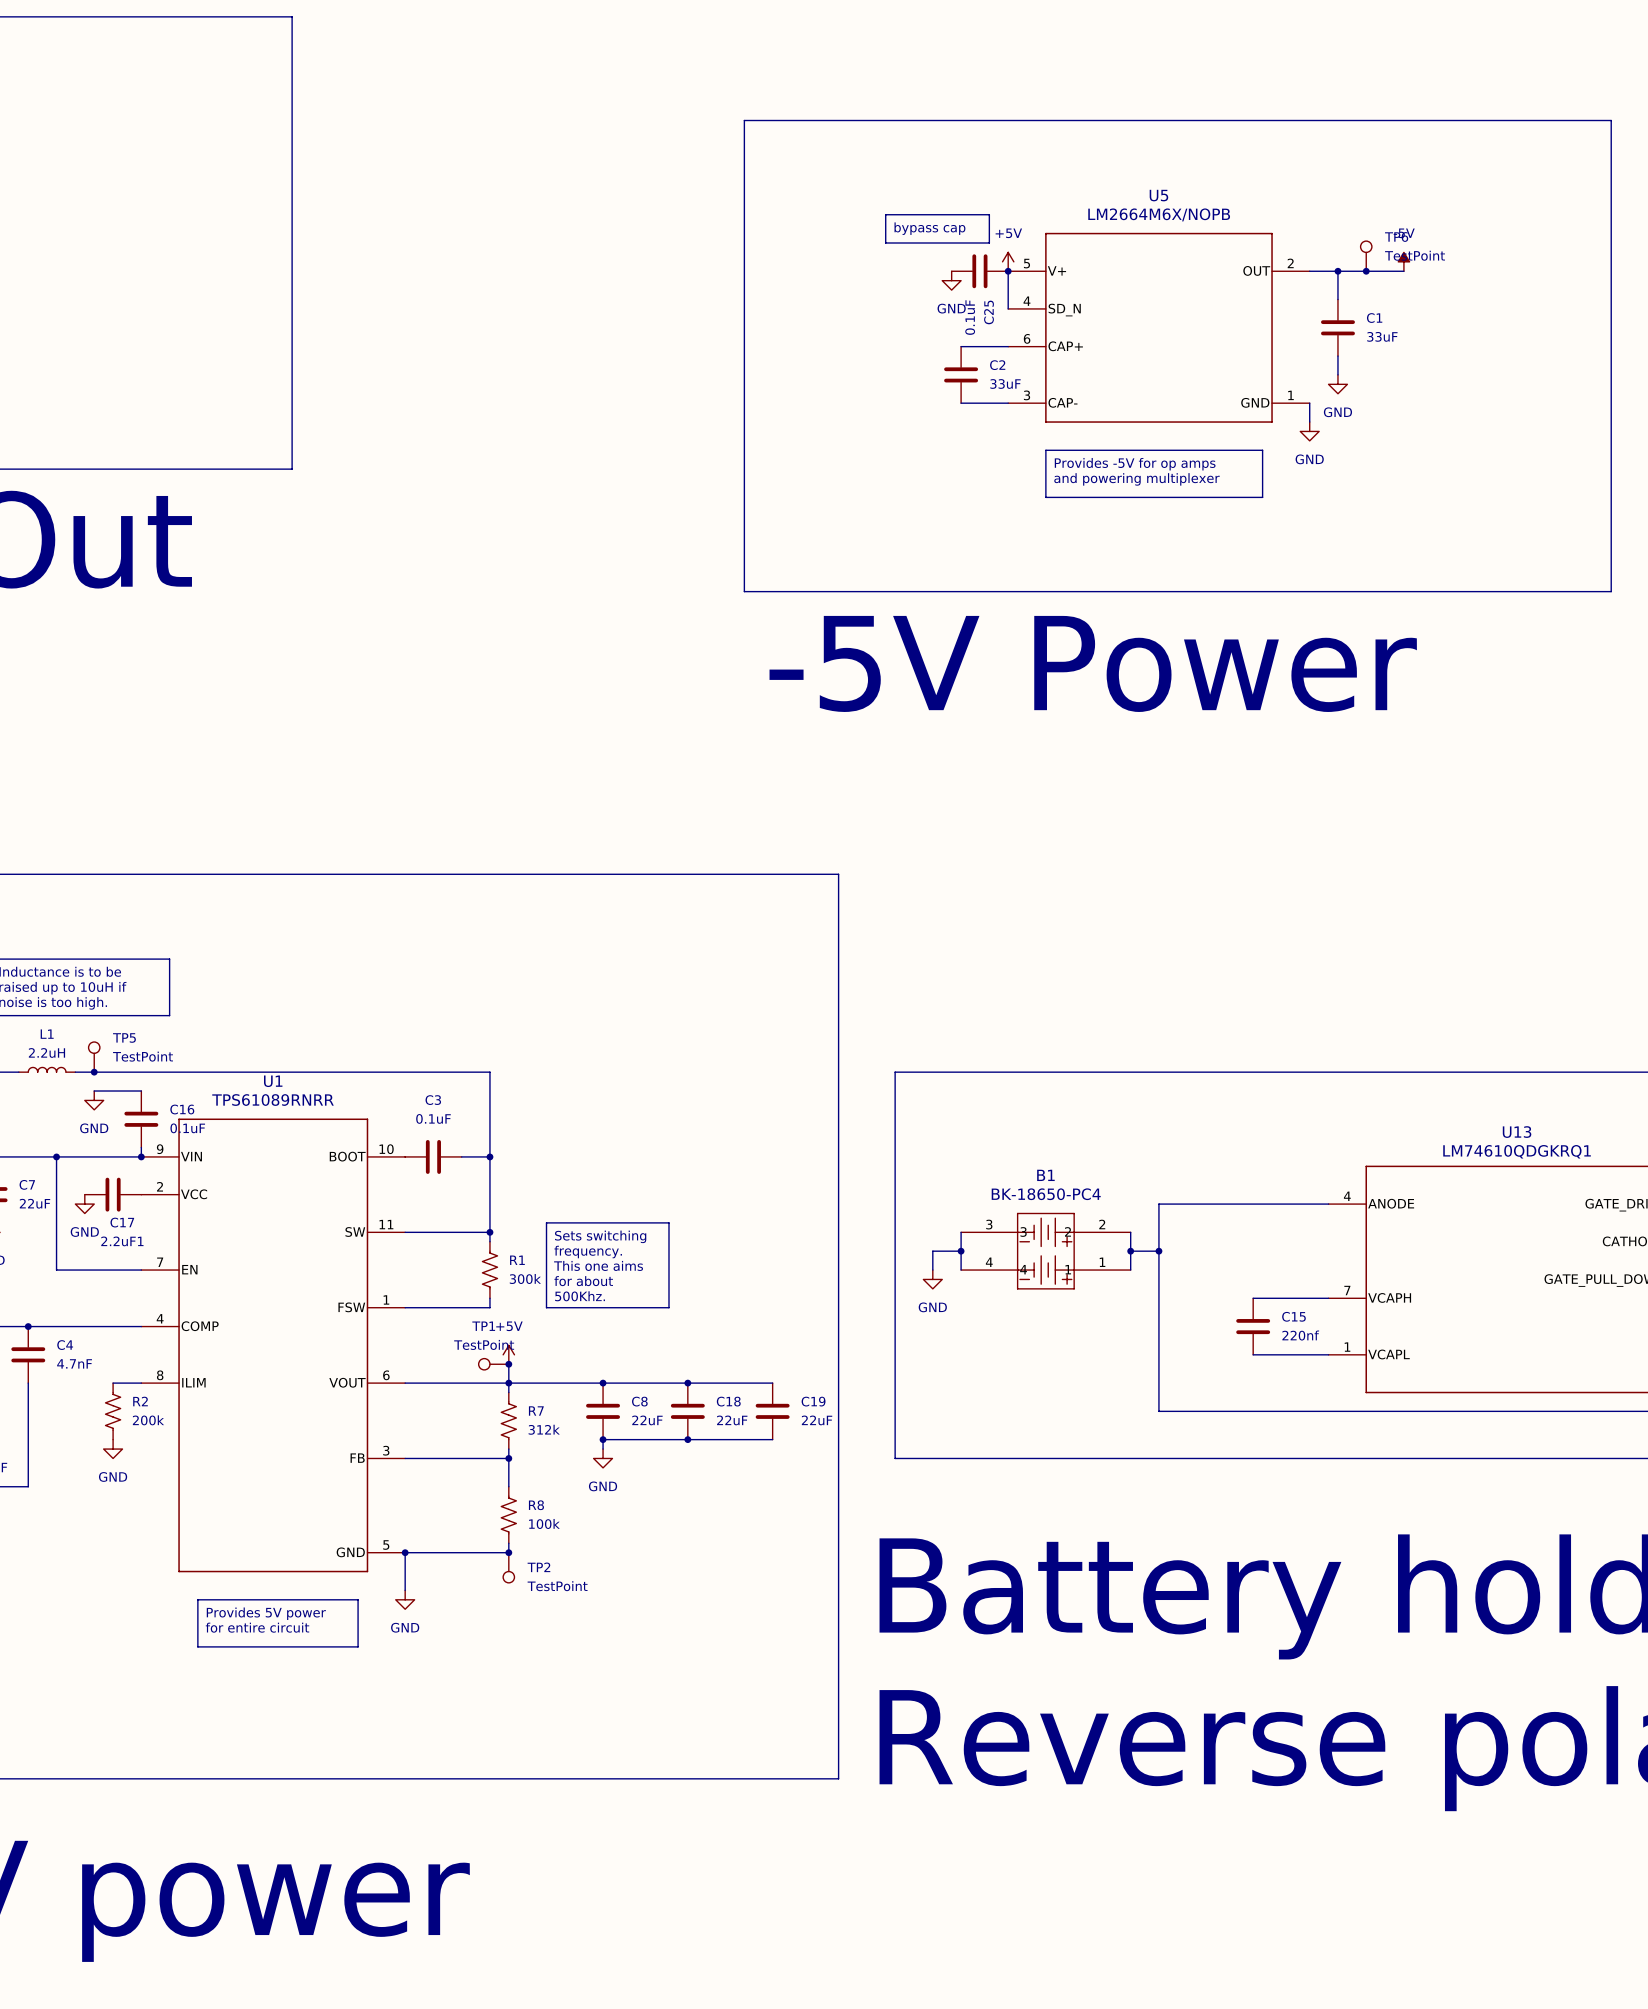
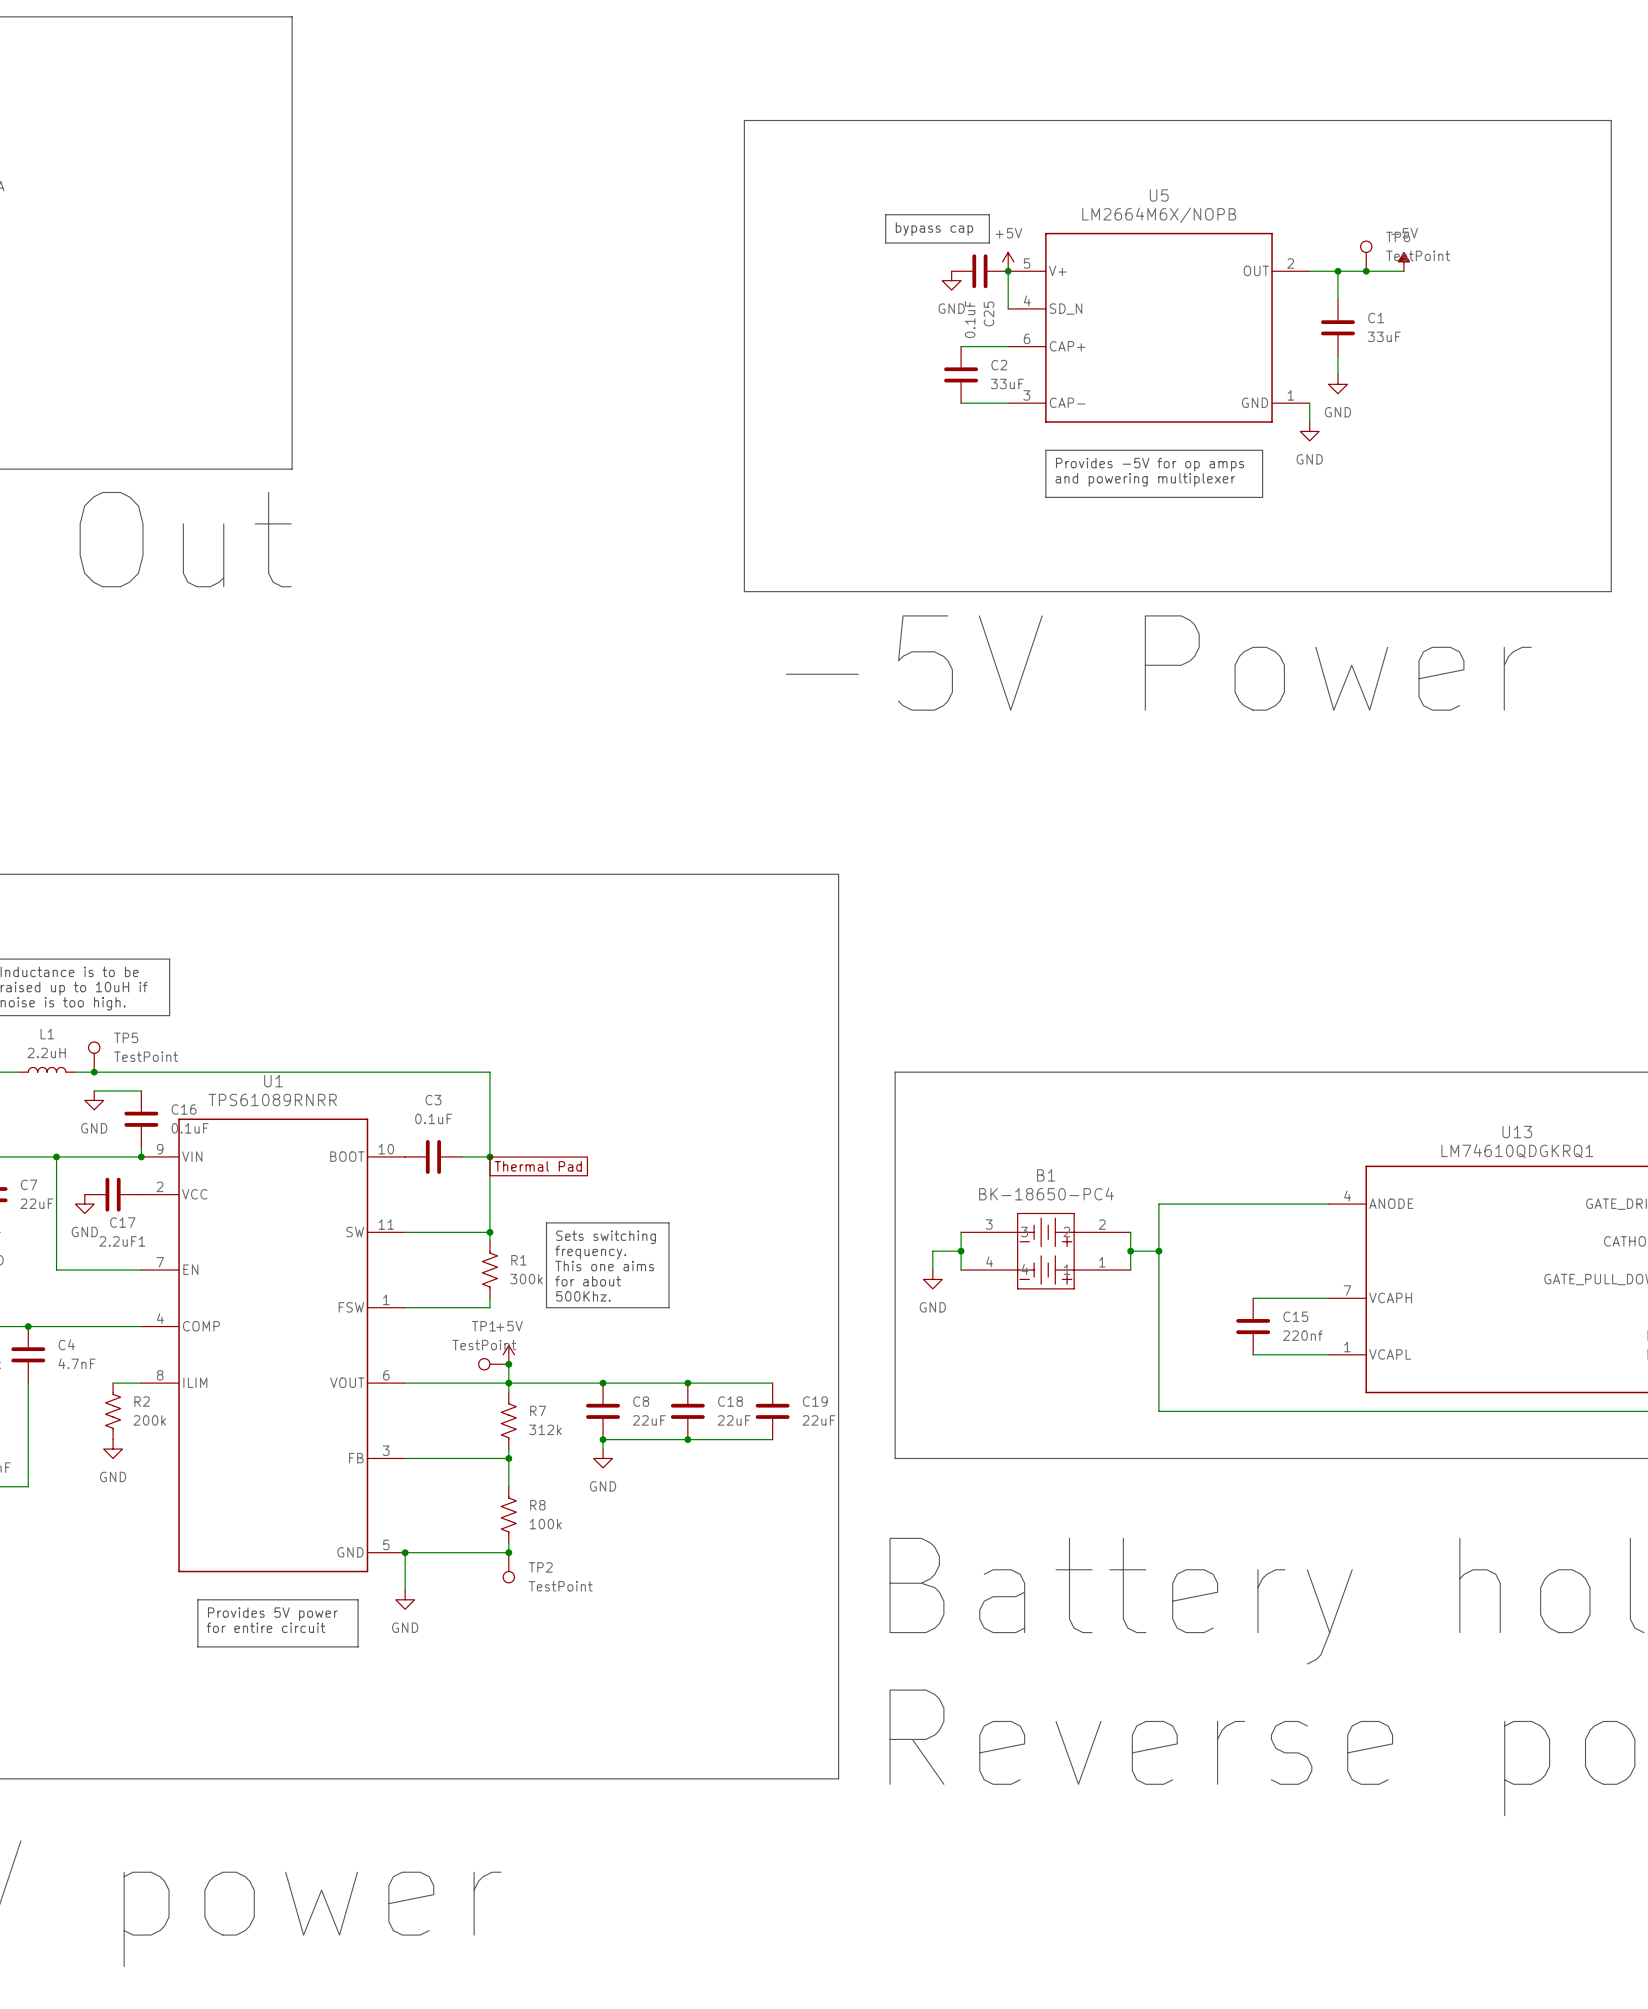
global label: none -> Thermal Pad (538, 1166)

